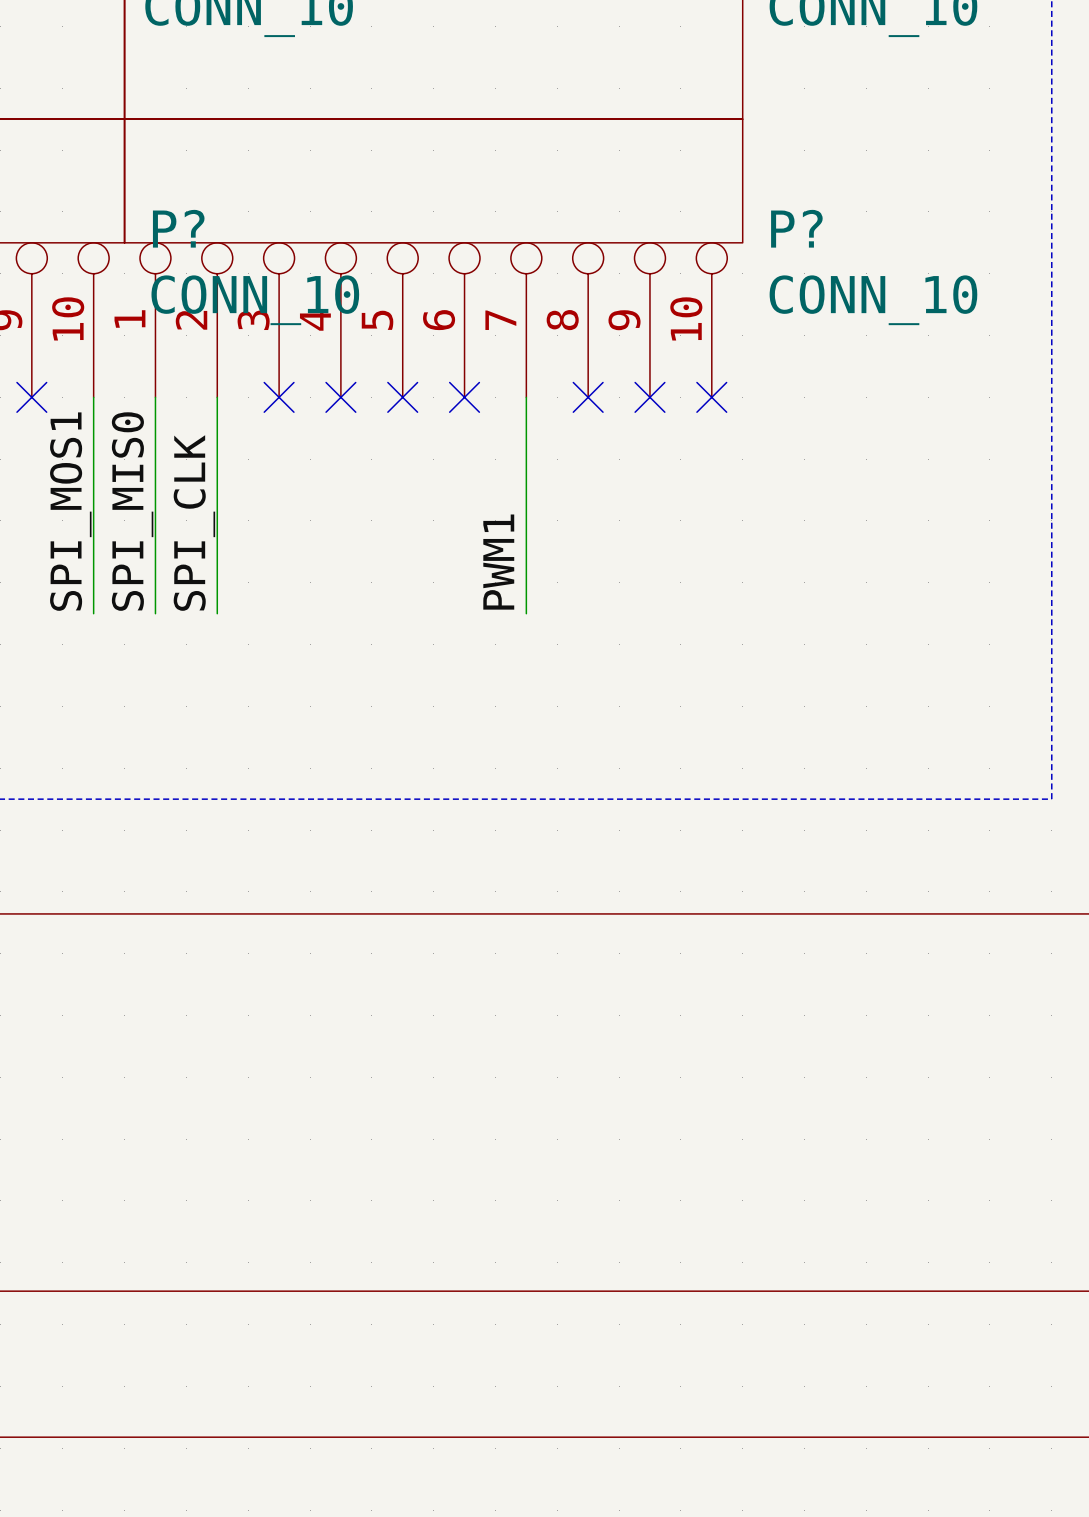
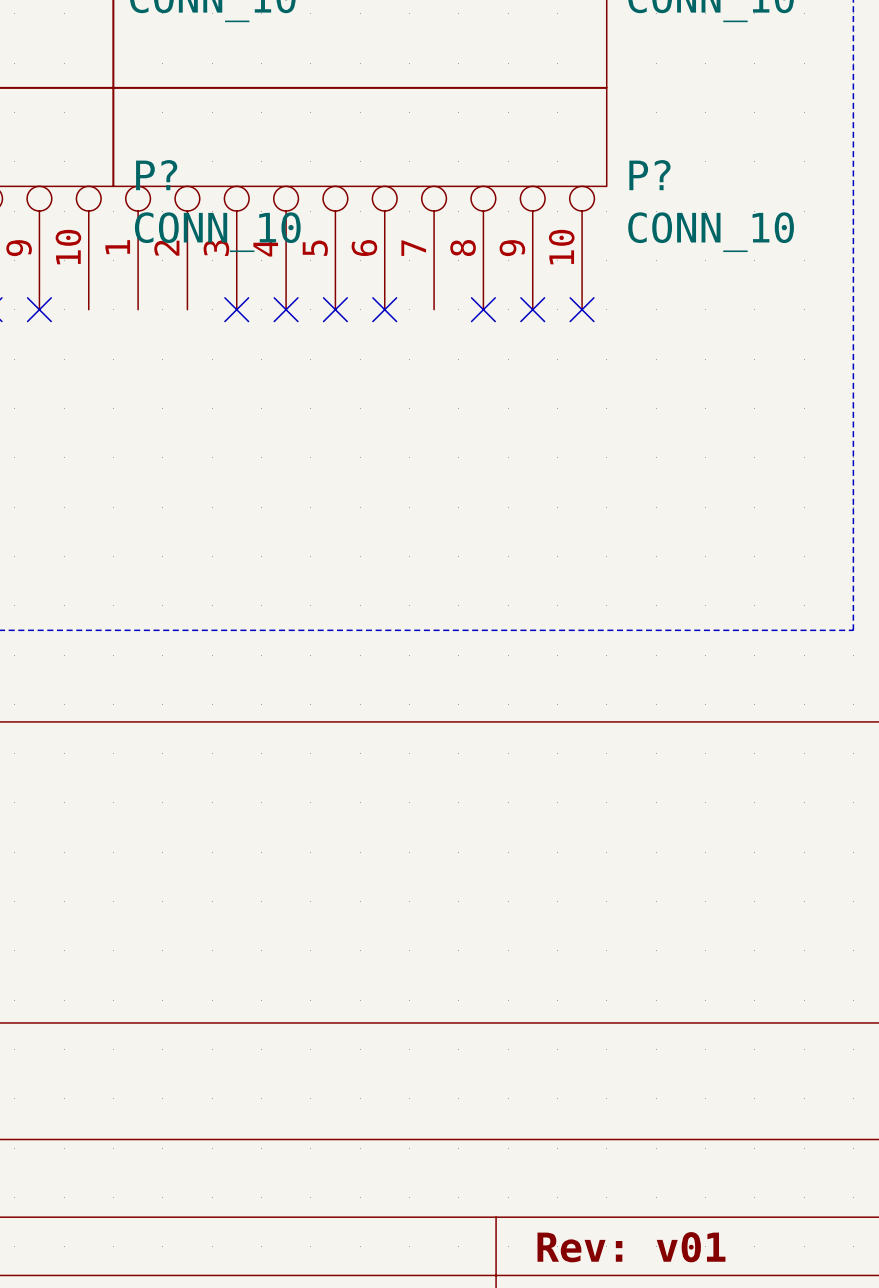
wire: (93, 397) (93, 613) -> none
wire: (155, 397) (155, 613) -> none
wire: (217, 397) (217, 613) -> none
wire: (526, 397) (526, 613) -> none
label: SPI_MOS1 (70, 511) -> none
label: SPI_MIS0 (132, 511) -> none
label: SPI_CLK (194, 523) -> none
label: PWM1 (498, 562) -> none

